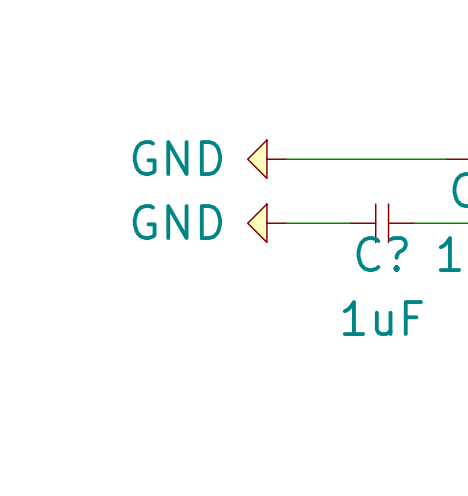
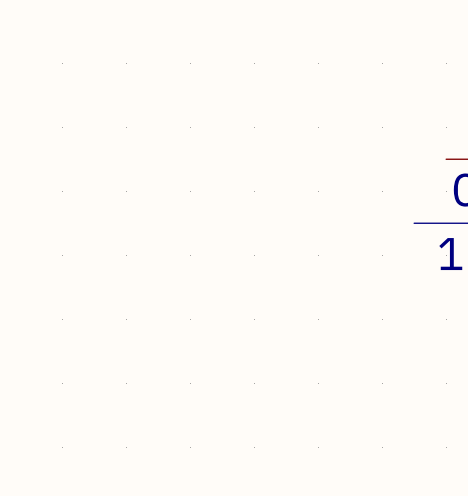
power symbol: GND (266, 159) -> none
wire: (286, 159) (446, 159) -> none
power symbol: GND (266, 223) -> none
wire: (286, 223) (350, 223) -> none
C?: 1uF (382, 223) -> none

